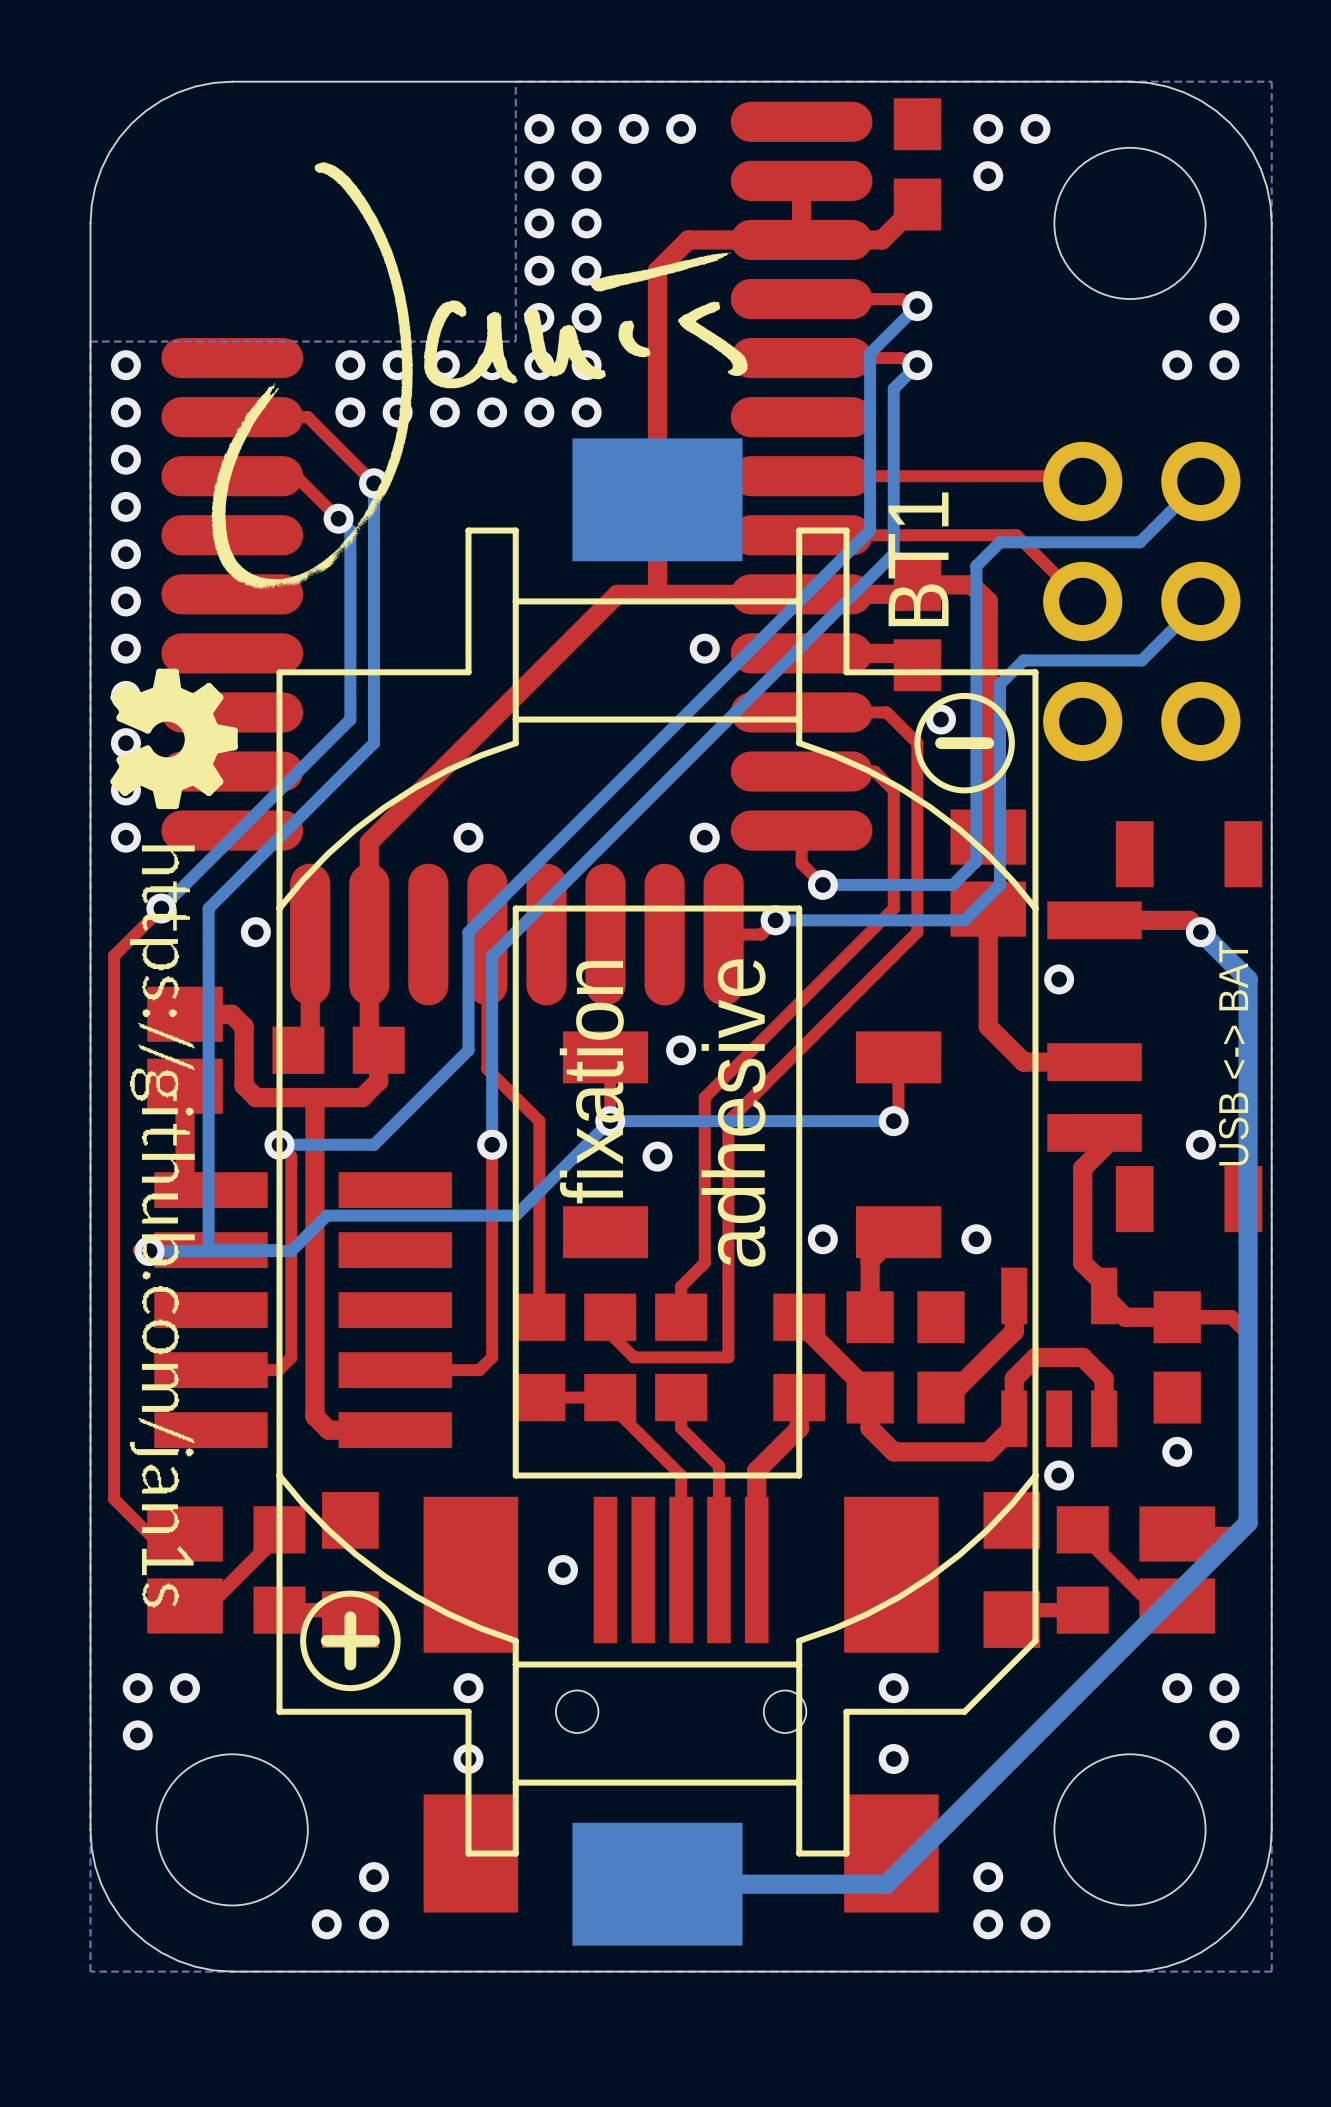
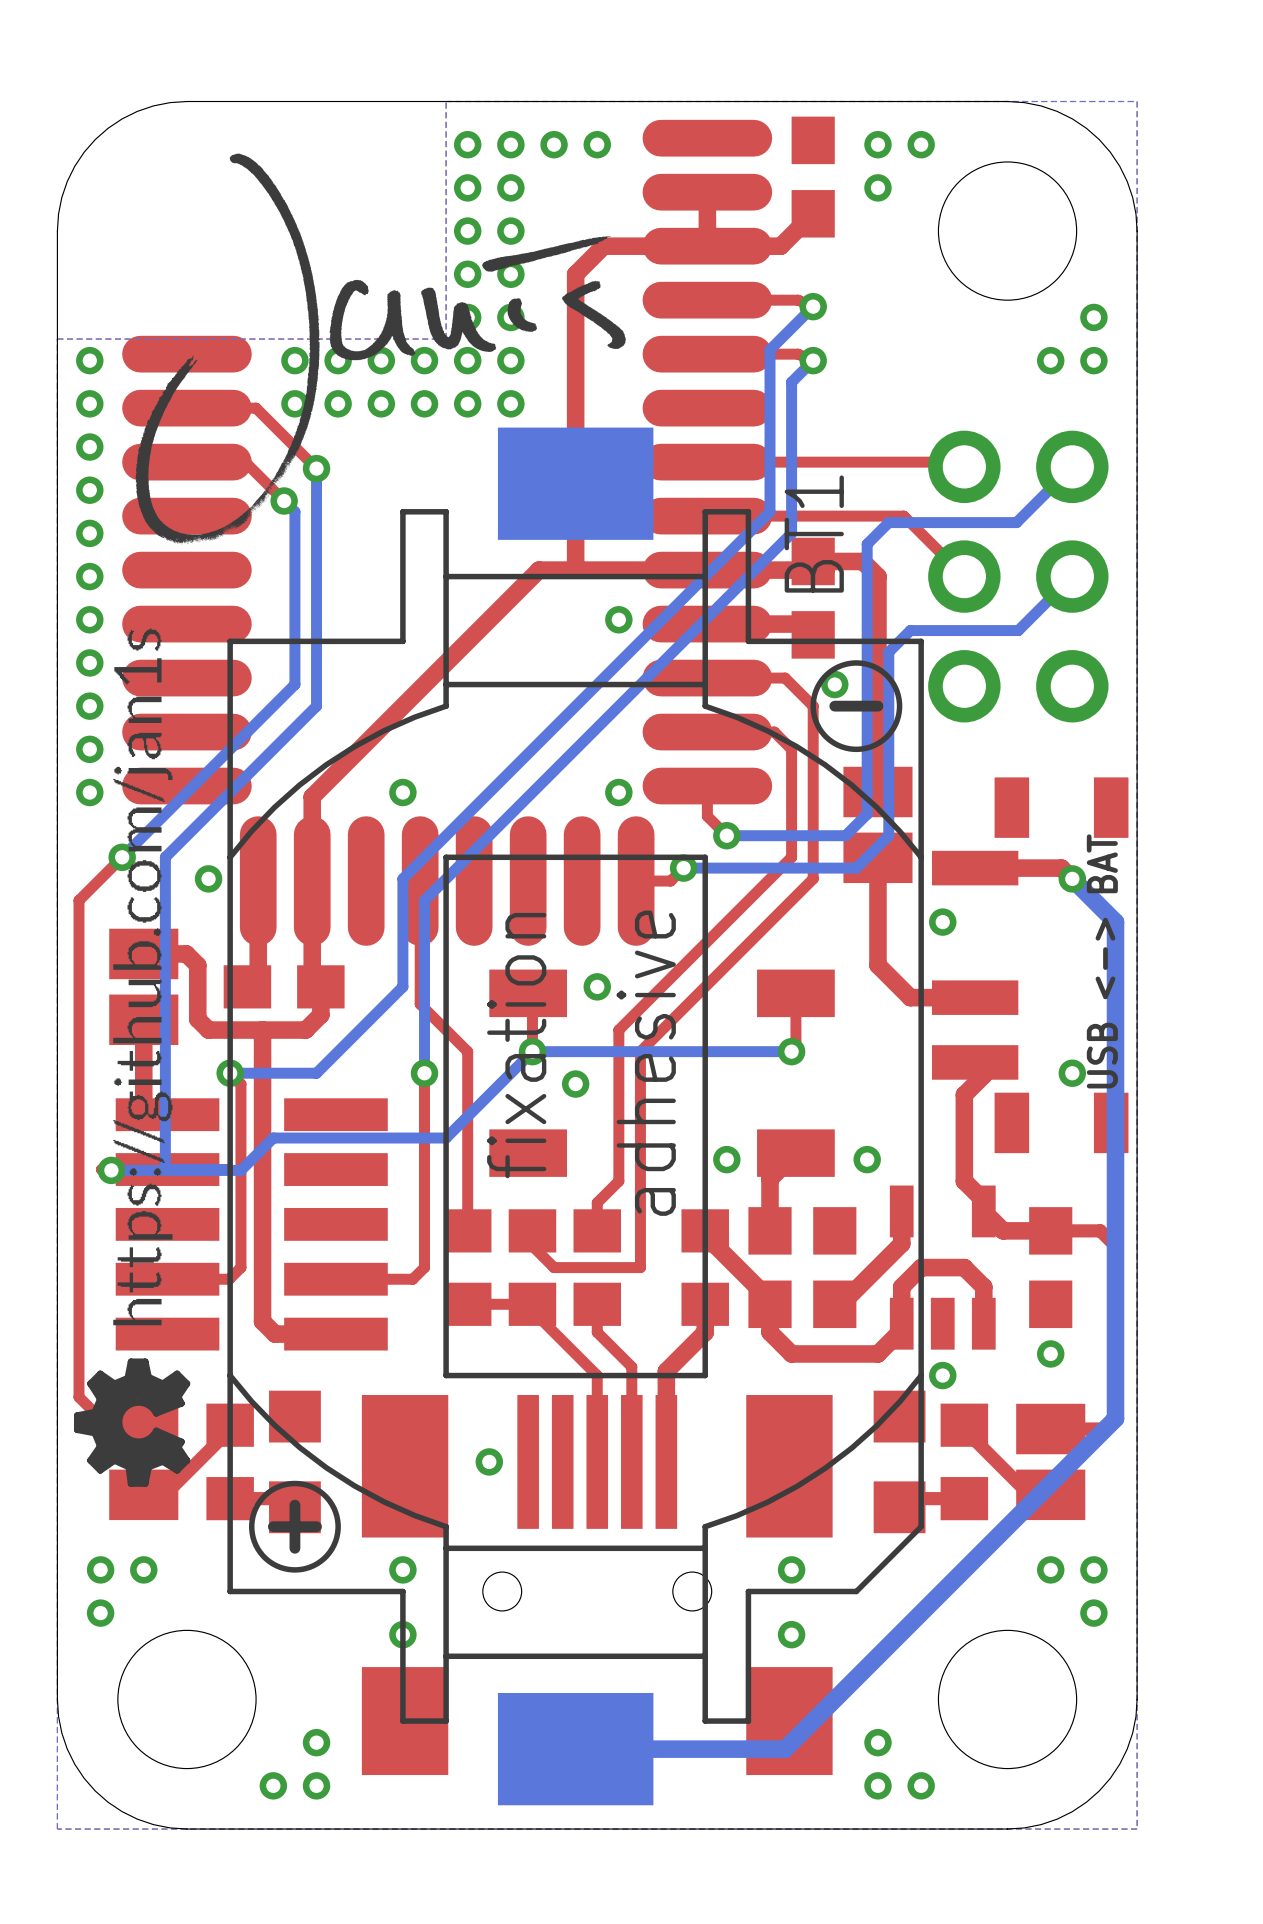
drawing position: (479, 376) -> (380, 349)
drawing: none -> [73, 628, 191, 1487]
drawing: [110, 668, 238, 1608] -> none

